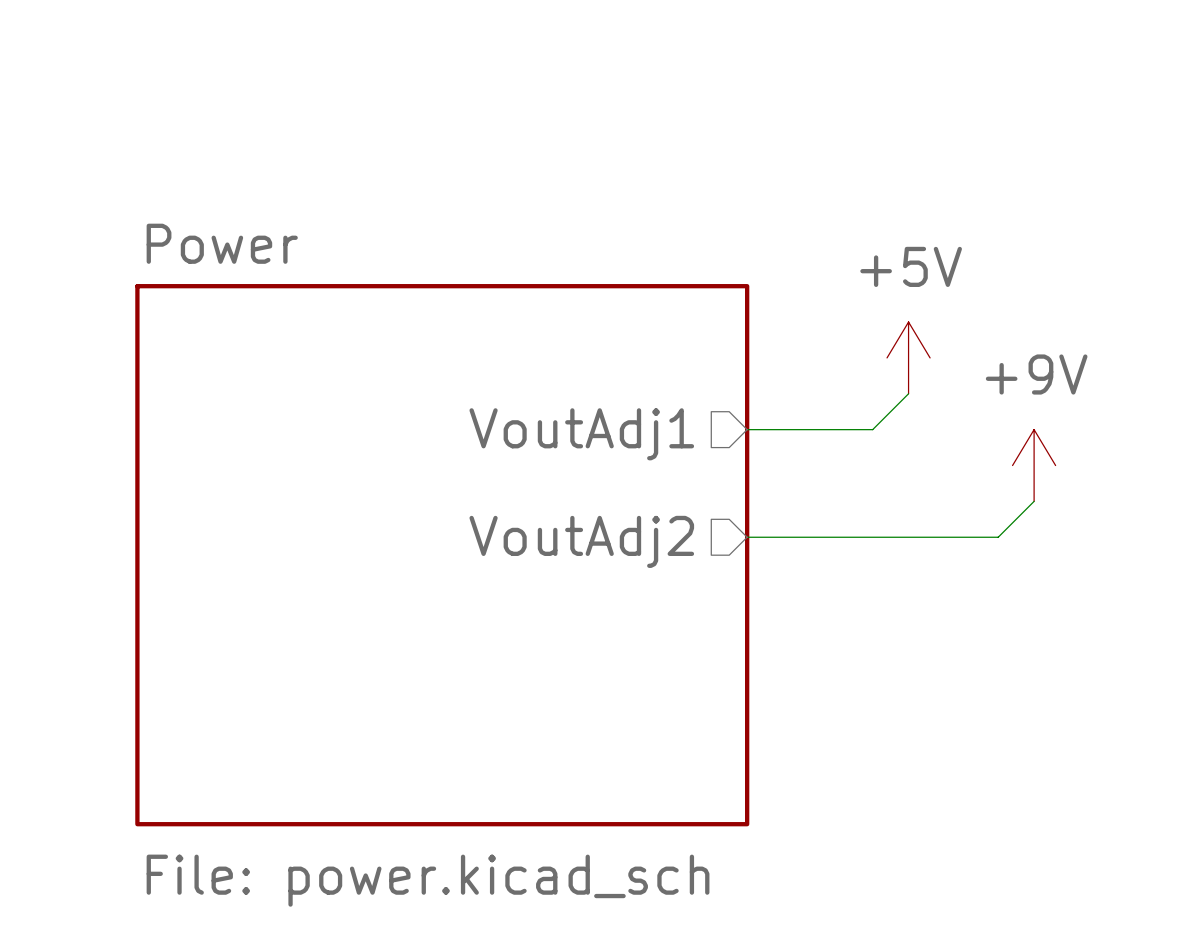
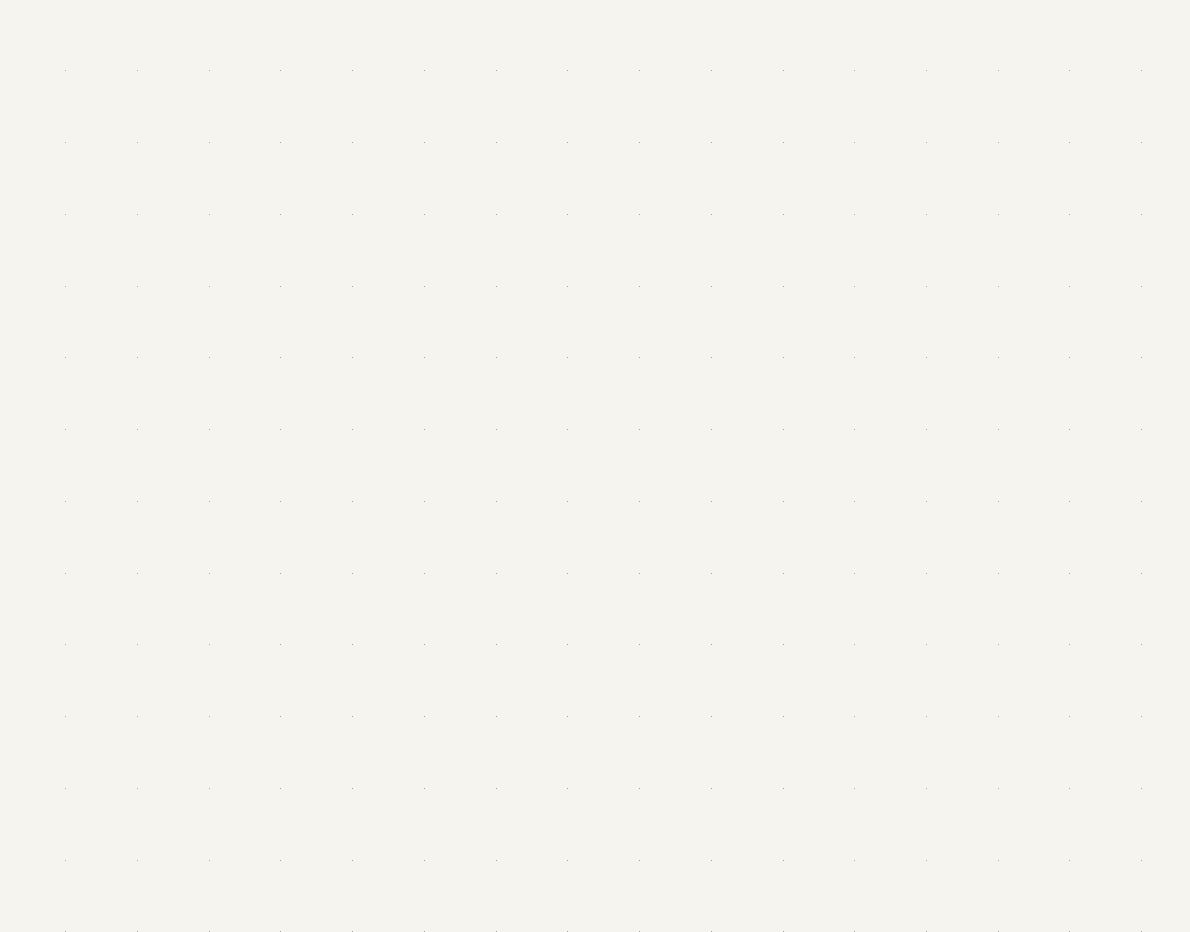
power symbol: +5V (908, 357) -> none
wire: (908, 393) (872, 429) (747, 429) -> none
sheet pin: VoutAdj1 (581, 434) -> none
power symbol: +9V (1034, 465) -> none
wire: (1034, 501) (998, 537) (747, 537) -> none
sheet pin: VoutAdj2 (581, 541) -> none
sheet Power: File: power.kicad_sch (442, 555) -> none

